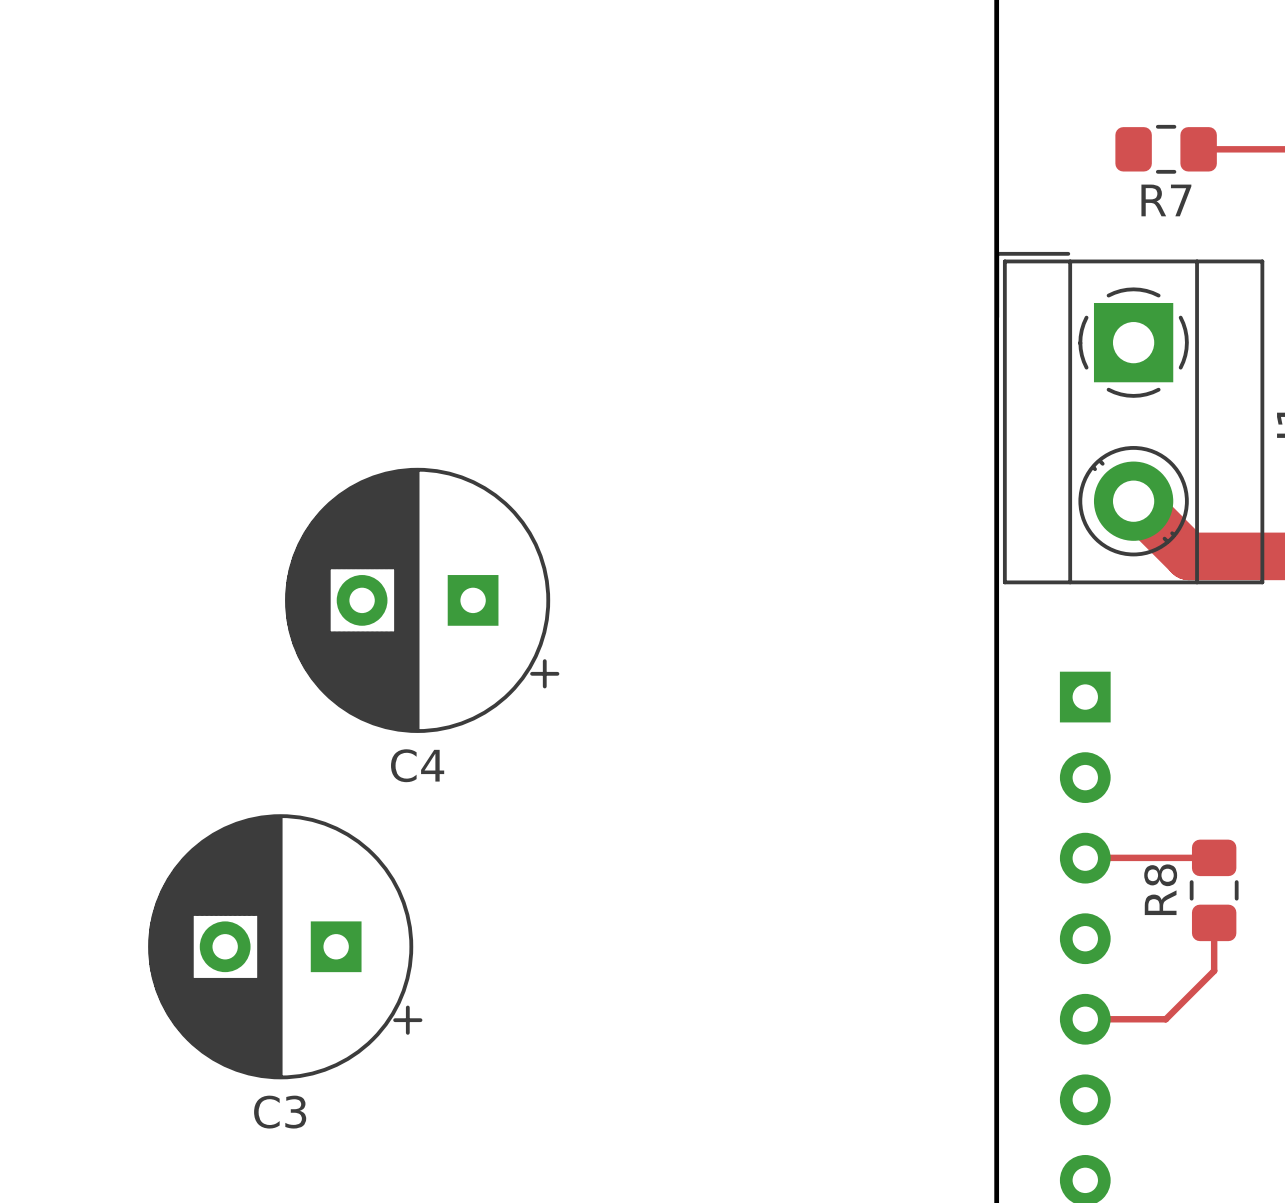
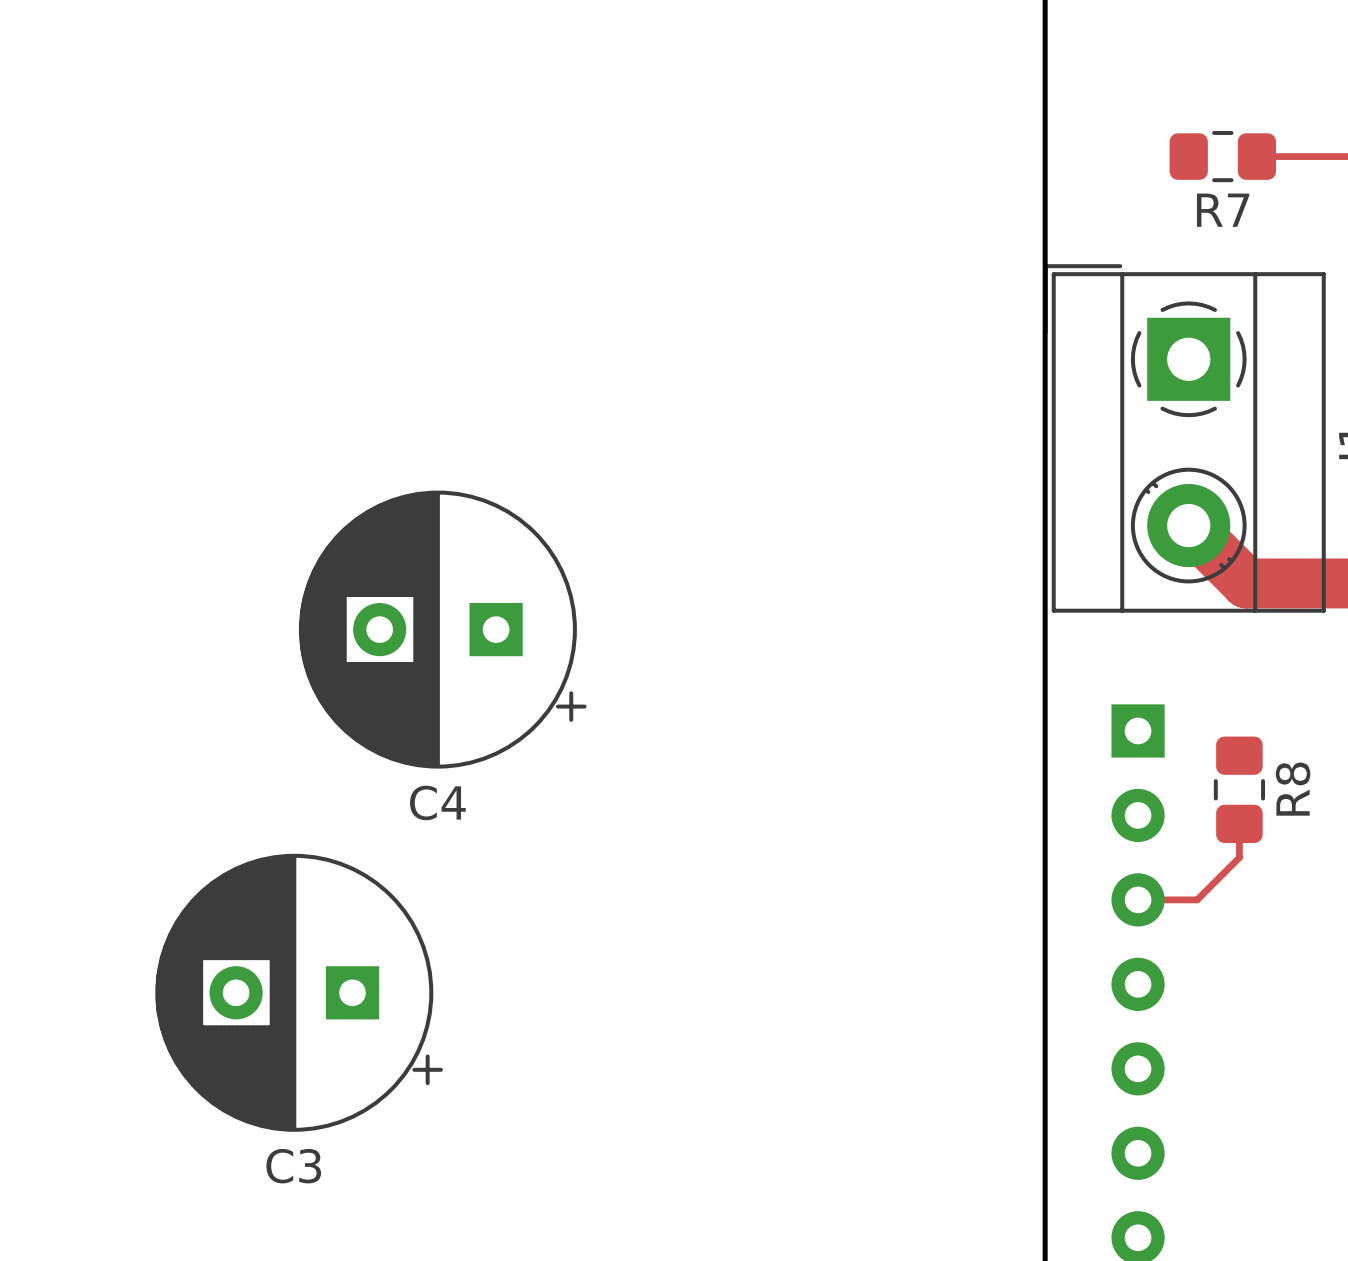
track: (1085, 857) (1214, 857) -> (1138, 899) (1197, 899) (1239, 857) (1239, 823)
R8 name position: R8 (1160, 889) -> R8 (1293, 789)
R8 position: (1214, 890) -> (1239, 789)
track: (1214, 922) (1214, 970) (1165, 1019) (1085, 1019) -> none

